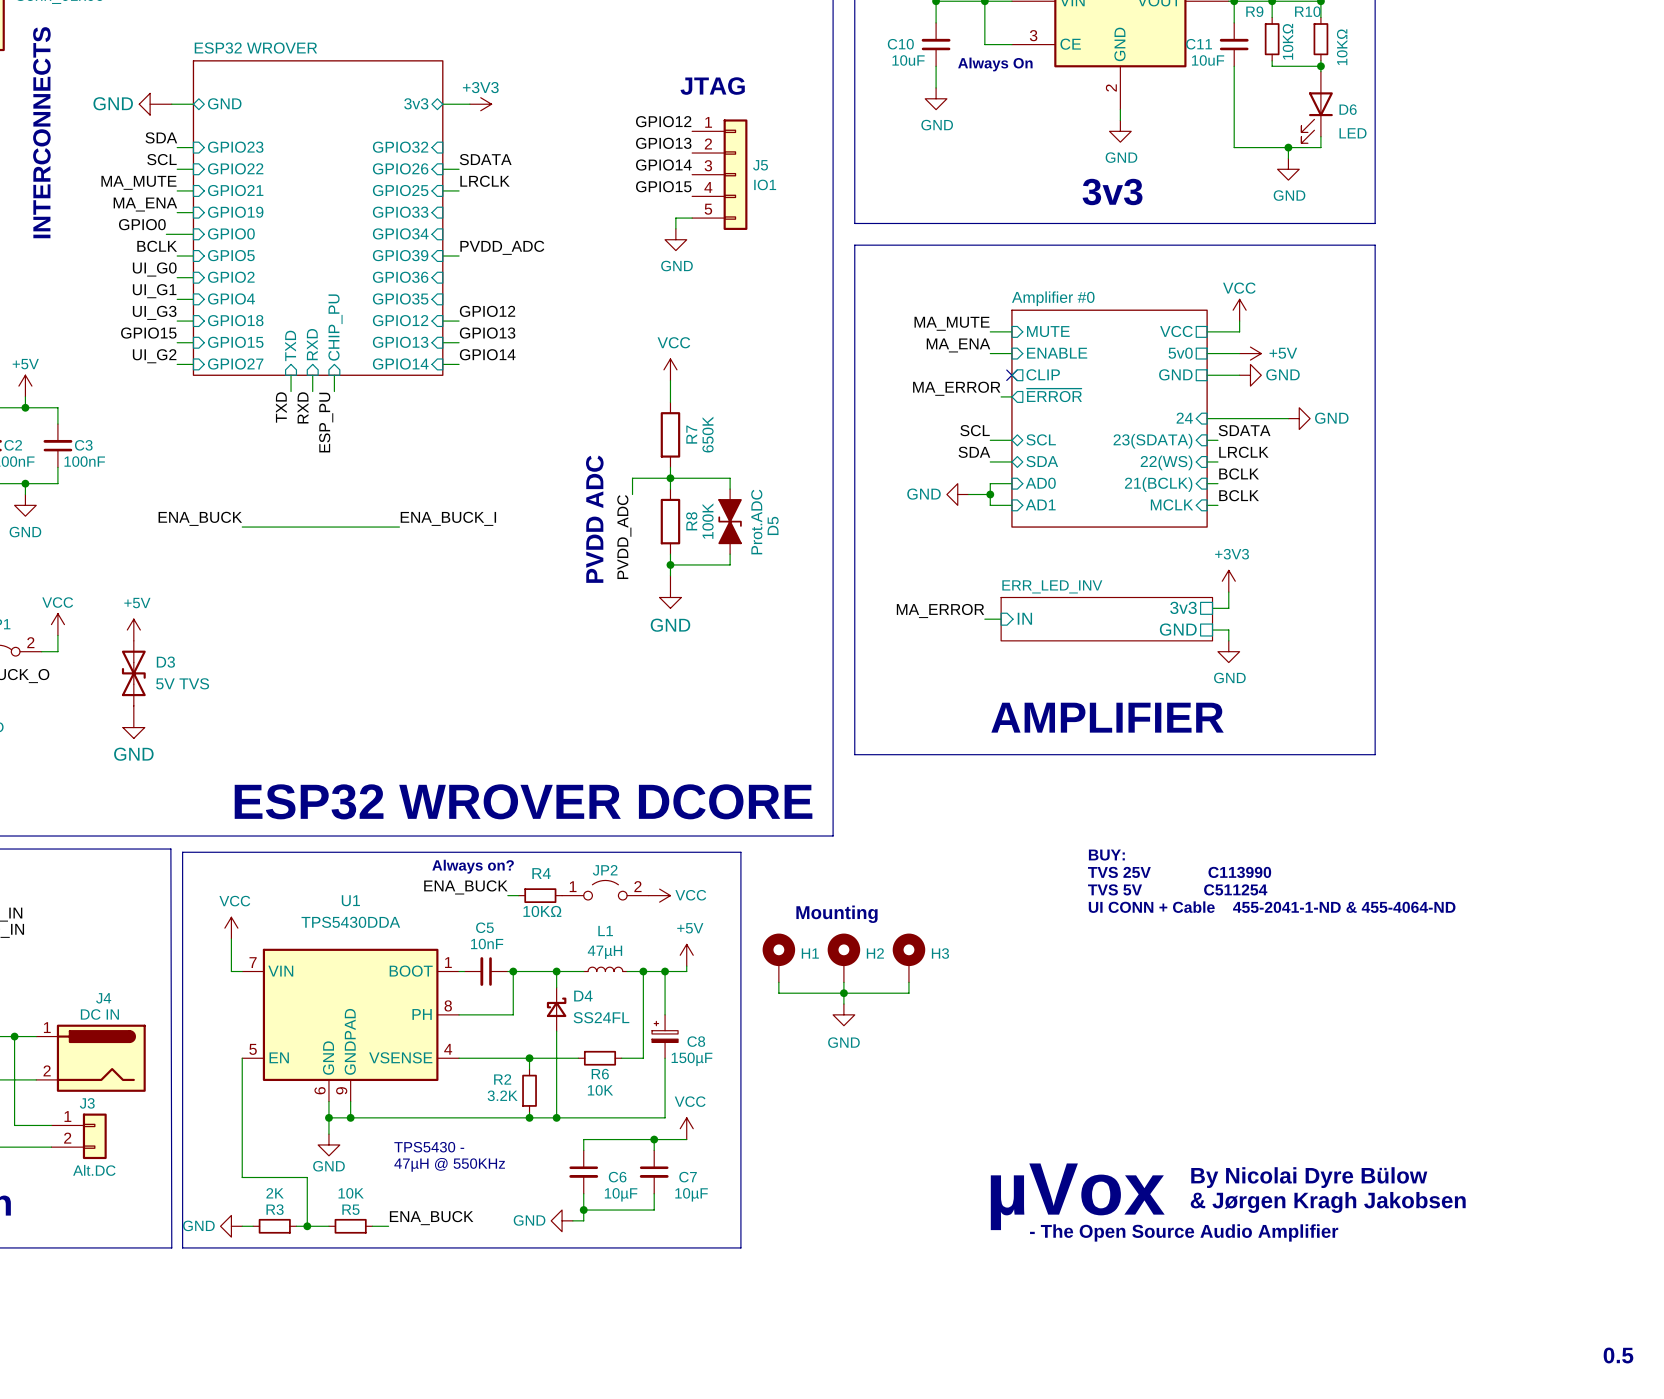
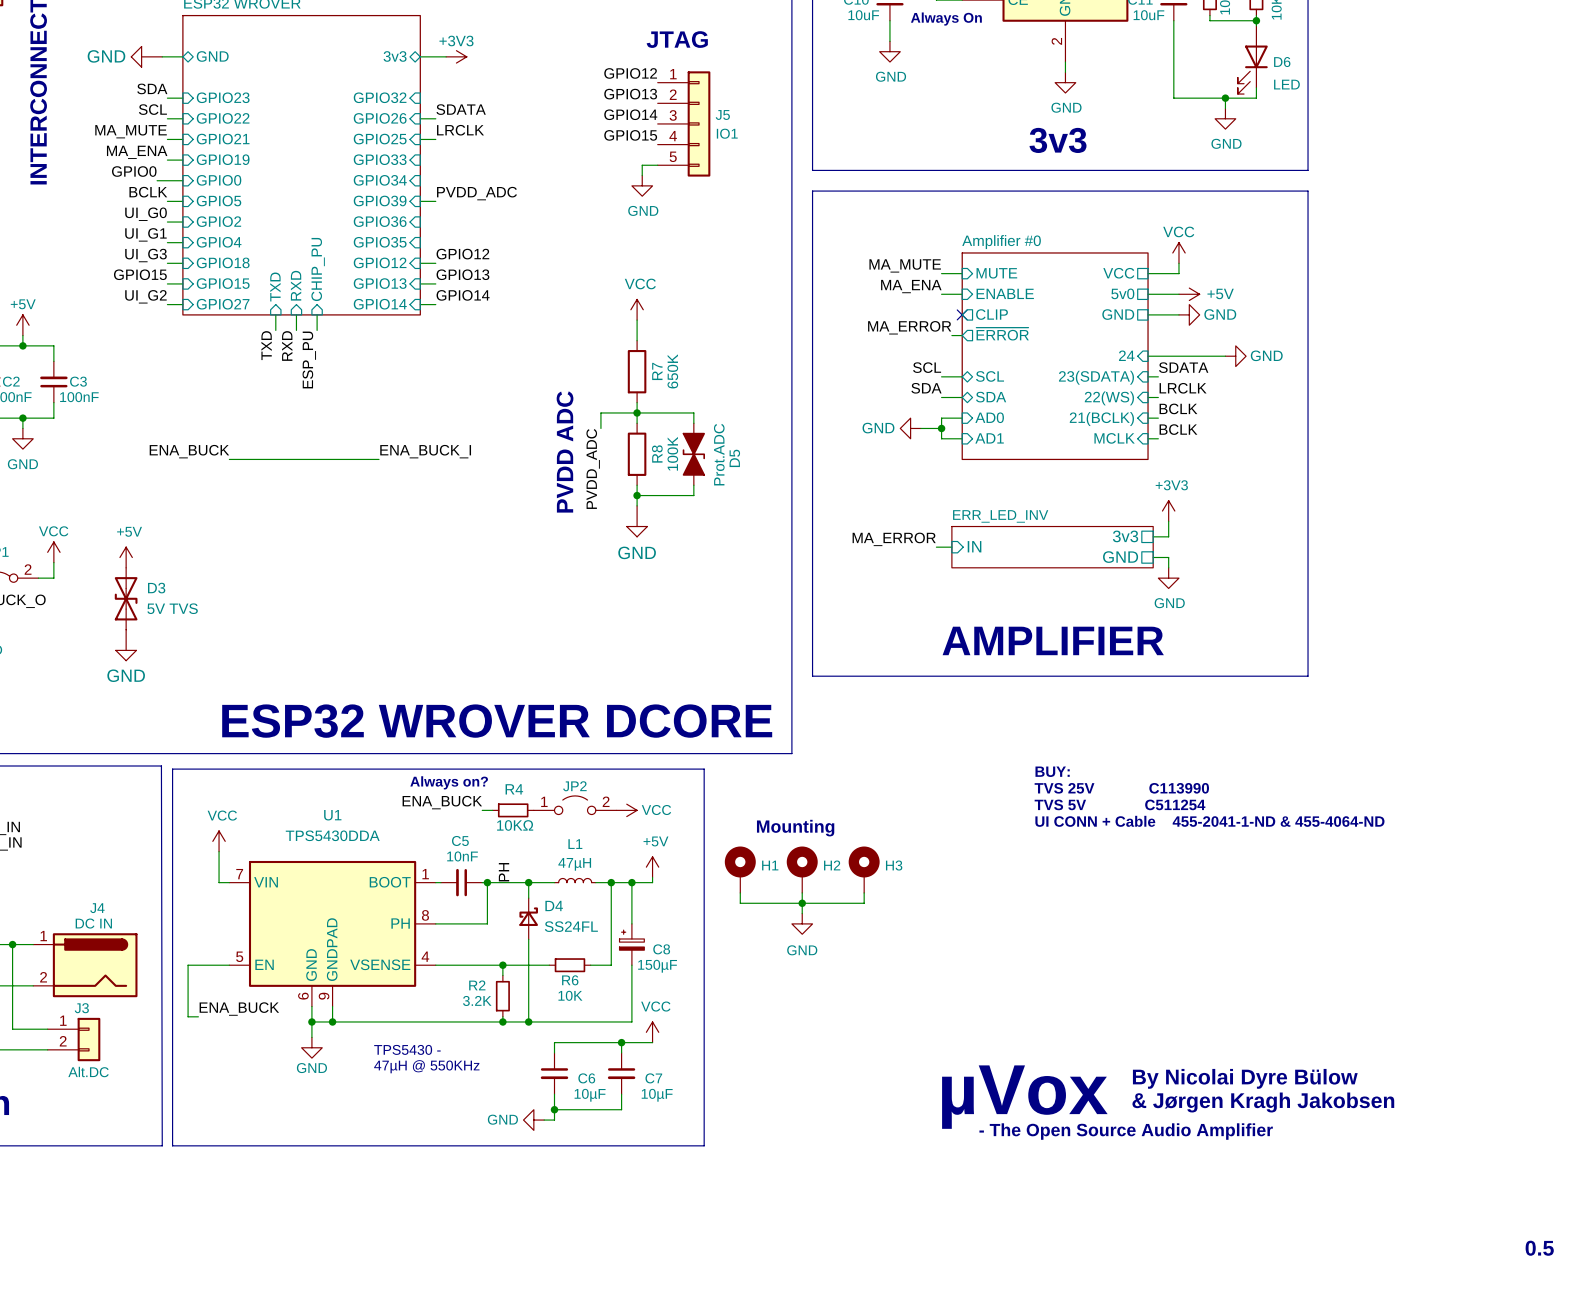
label: none -> PH (504, 872)
wire: (242, 1058) (242, 1177) (307, 1177) (307, 1226) -> (229, 965) (188, 965) (188, 1016) (198, 1016)
label position: ENA_BUCK (431, 1218) -> ENA_BUCK (239, 1009)
power symbol: GND (231, 1226) -> none
wire: (242, 1226) (253, 1226) -> none
R3: 2K (274, 1226) -> none
wire: (296, 1226) (328, 1226) -> none
junction: (307, 1226) -> none
R5: 10K (350, 1226) -> none
wire: (372, 1226) (388, 1226) -> none

